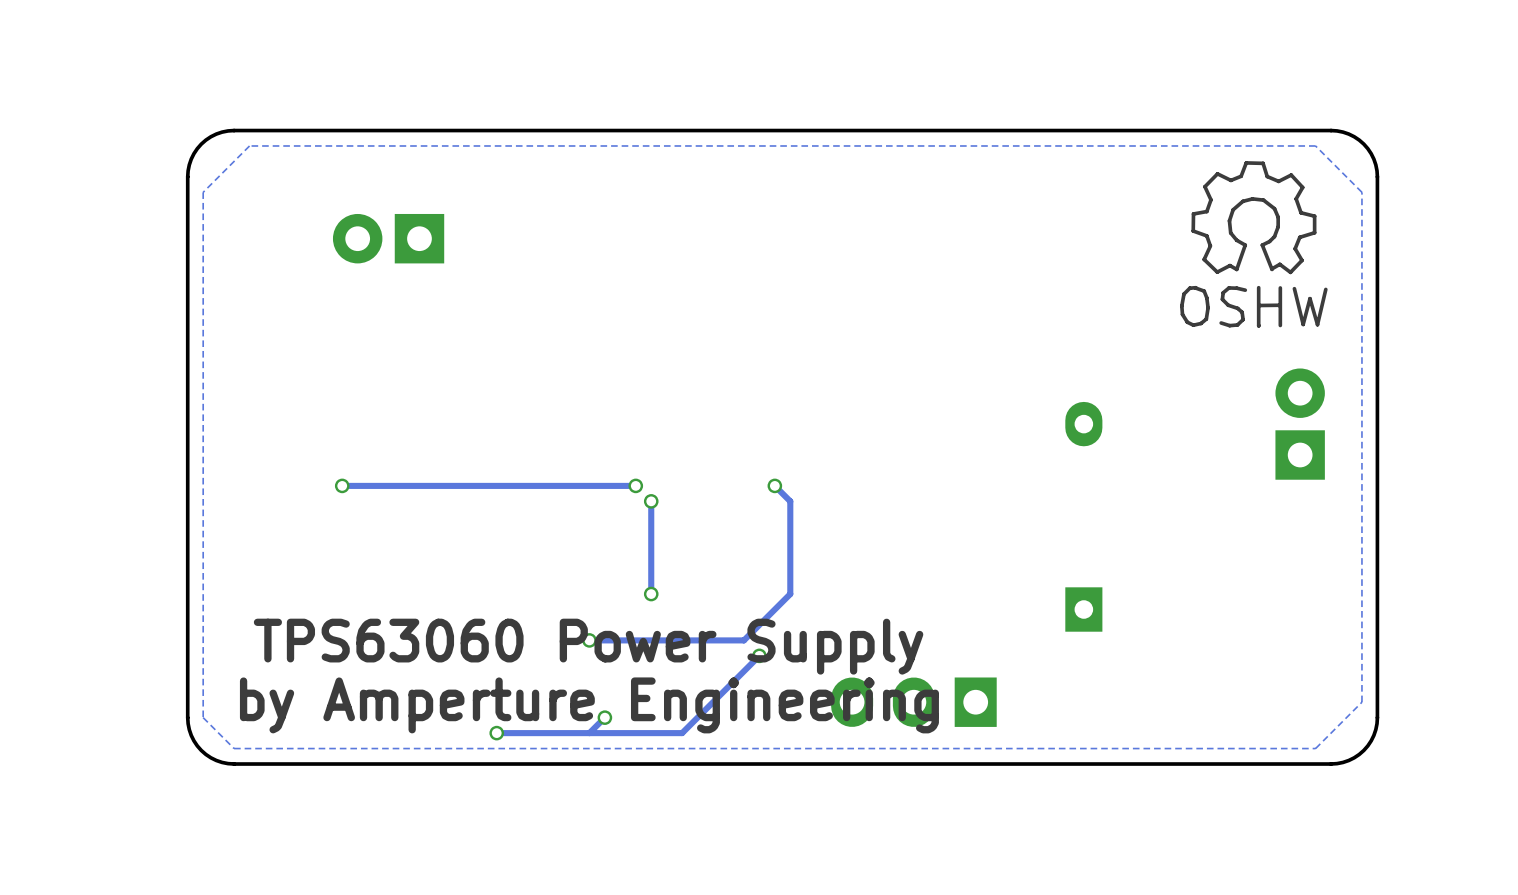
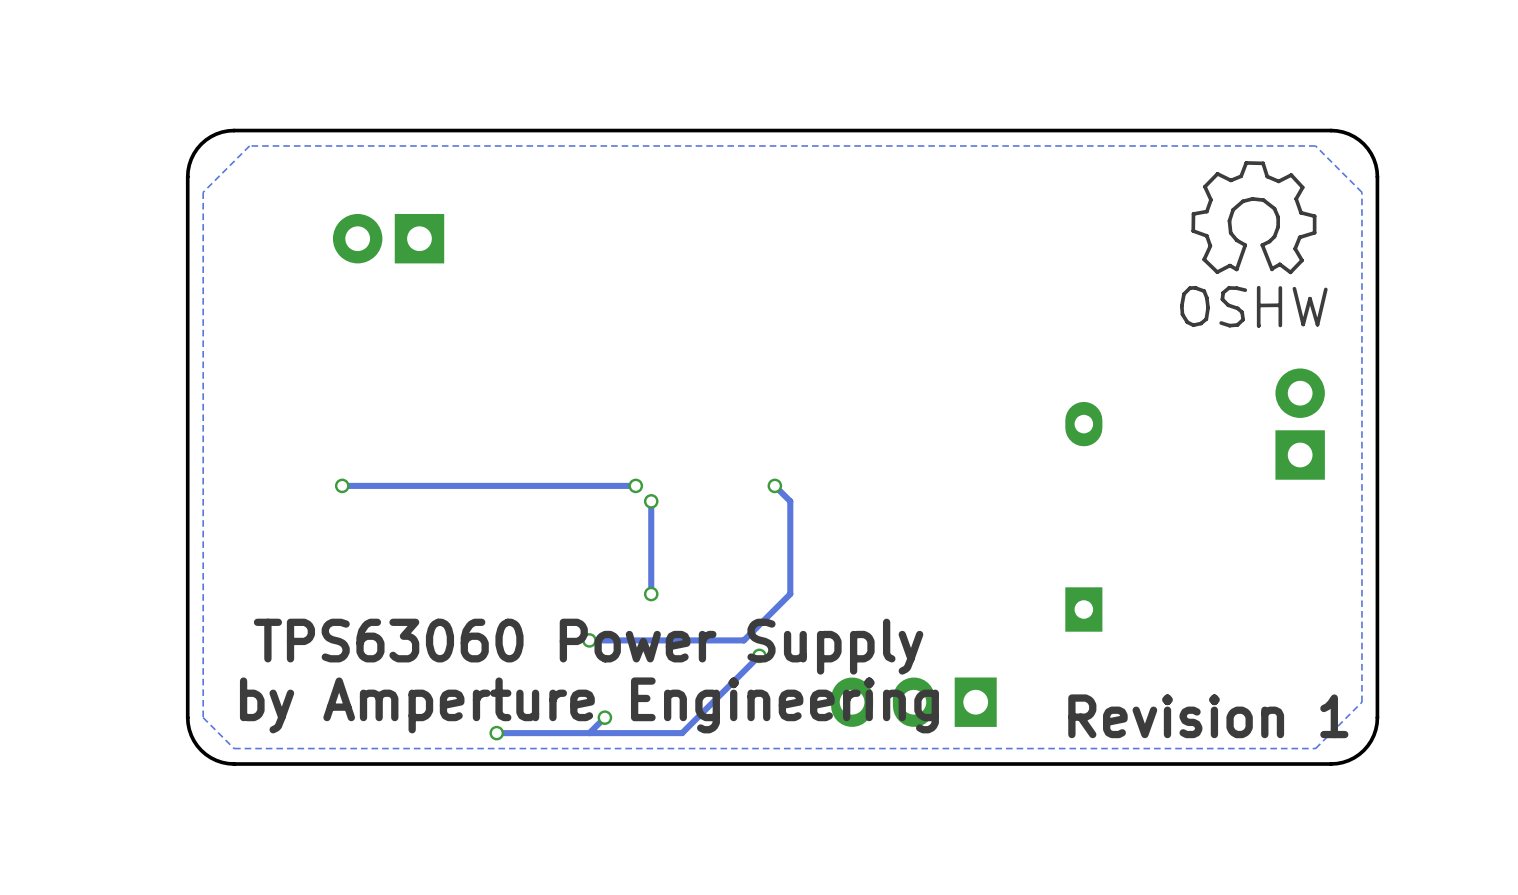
text: none -> Revision 1 (1208, 716)

